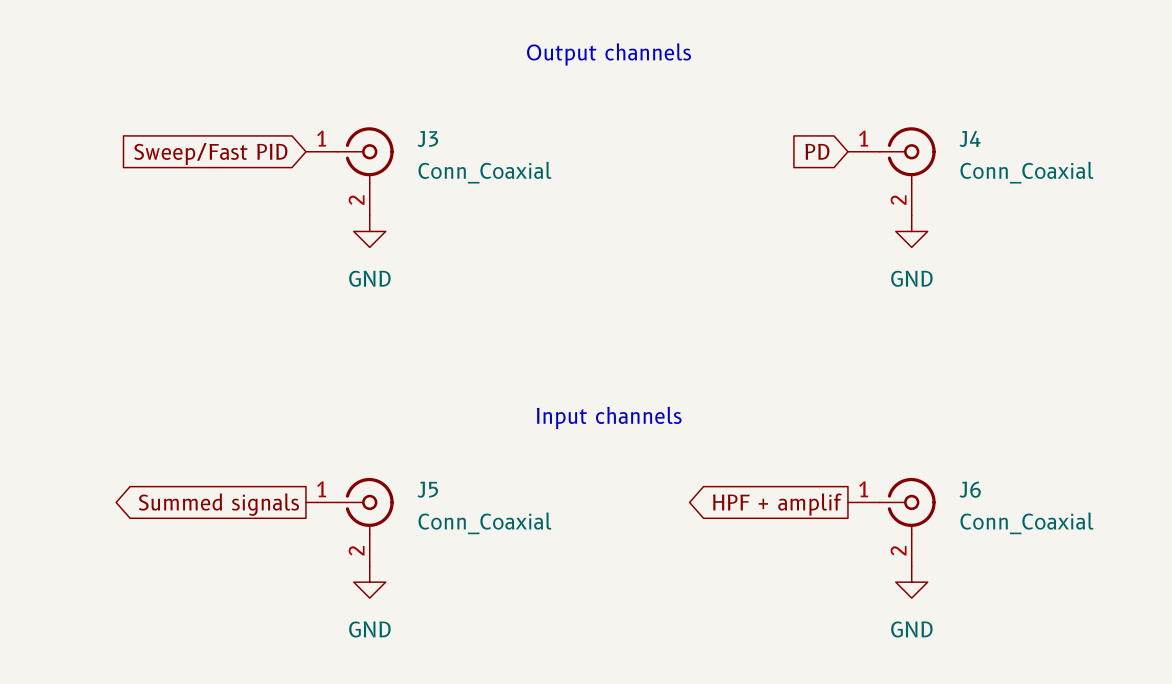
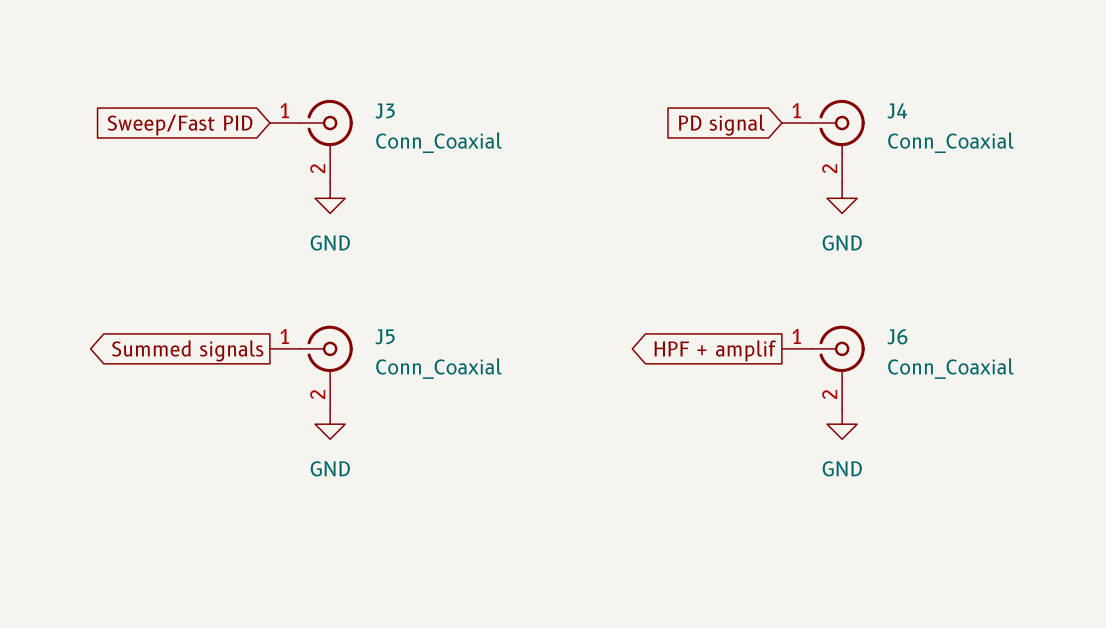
text: Output channels (609, 54) -> none
global label: PD (817, 151) -> PD signal (721, 125)
text: Input channels (609, 417) -> none
global label position: Summed signals (218, 504) -> Summed signals (187, 350)
global label position: HPF + amplif (777, 504) -> HPF + amplif (715, 350)
J5 position: (349, 522) -> (311, 367)
J6 position: (891, 522) -> (823, 367)
power symbol position: GND (369, 582) -> GND (330, 424)
power symbol position: GND (911, 582) -> GND (842, 424)

